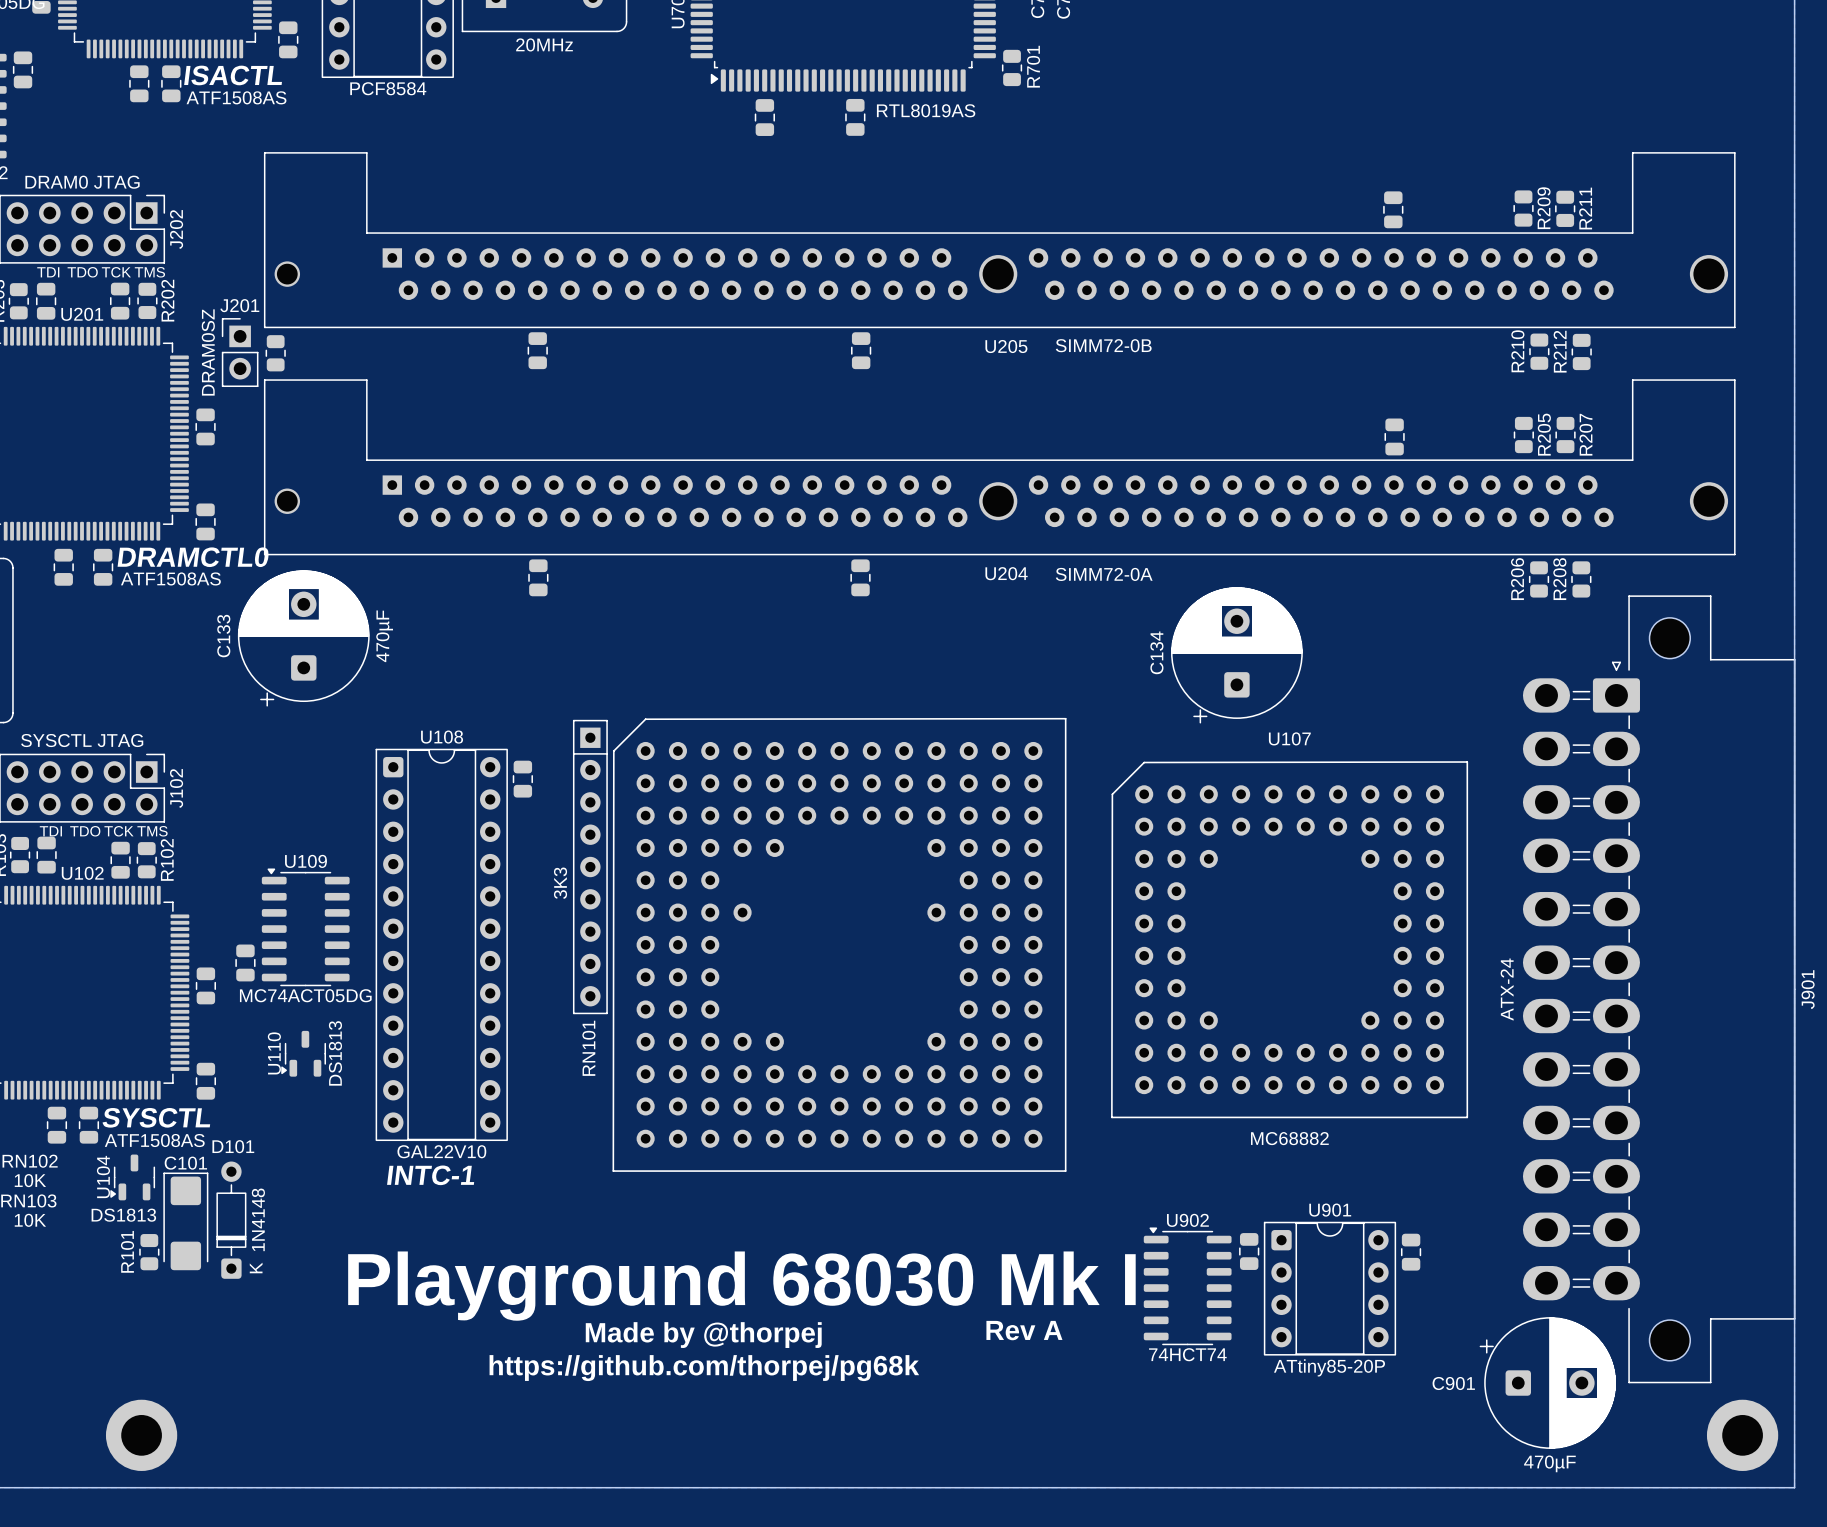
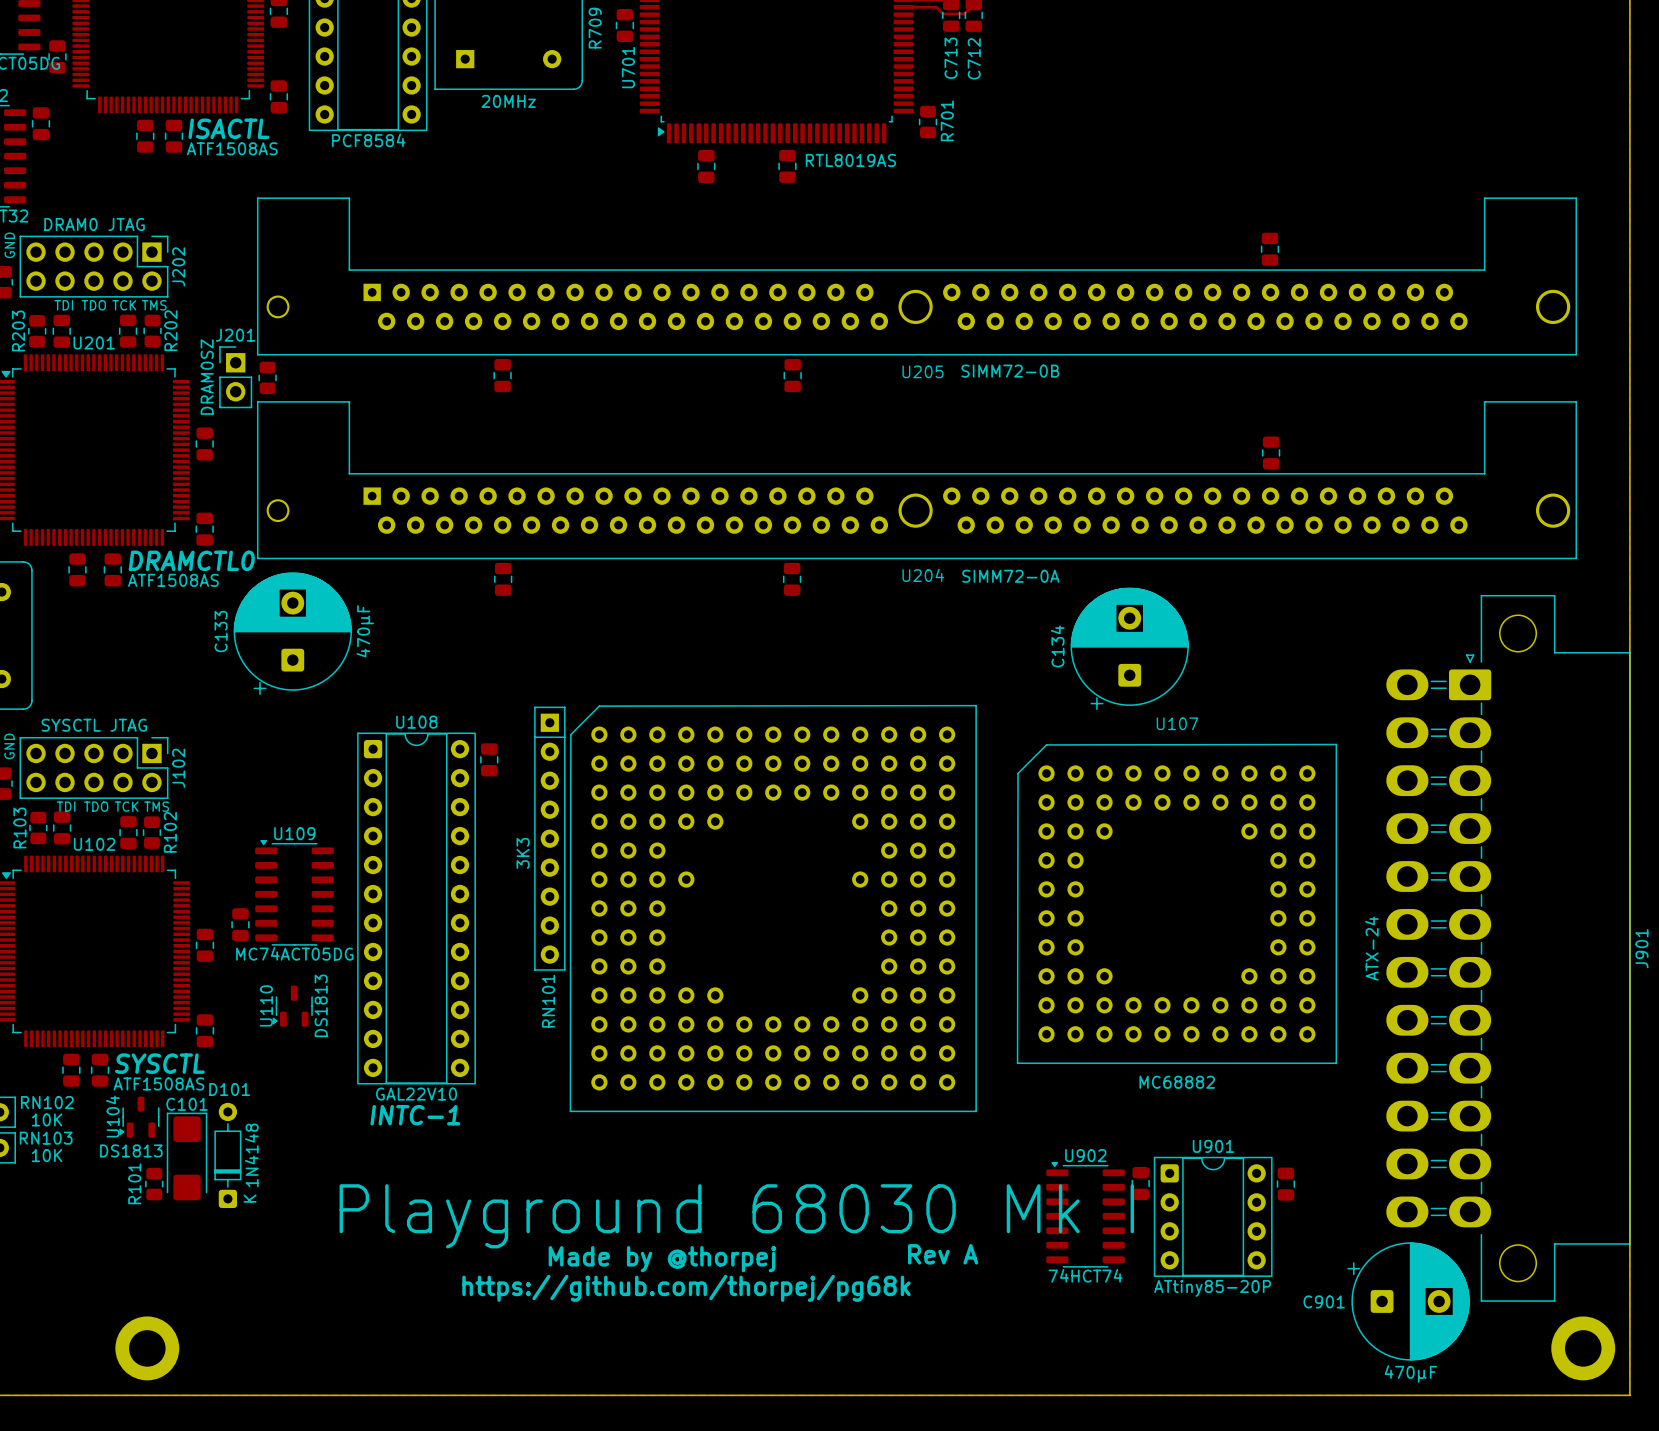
R209: (1523, 208) -> none
R211: (1565, 208) -> none
R210: (1539, 351) -> none
R212: (1581, 351) -> none
R205: (1523, 435) -> none
R207: (1565, 435) -> none
R206: (1539, 579) -> none
R208: (1581, 579) -> none

